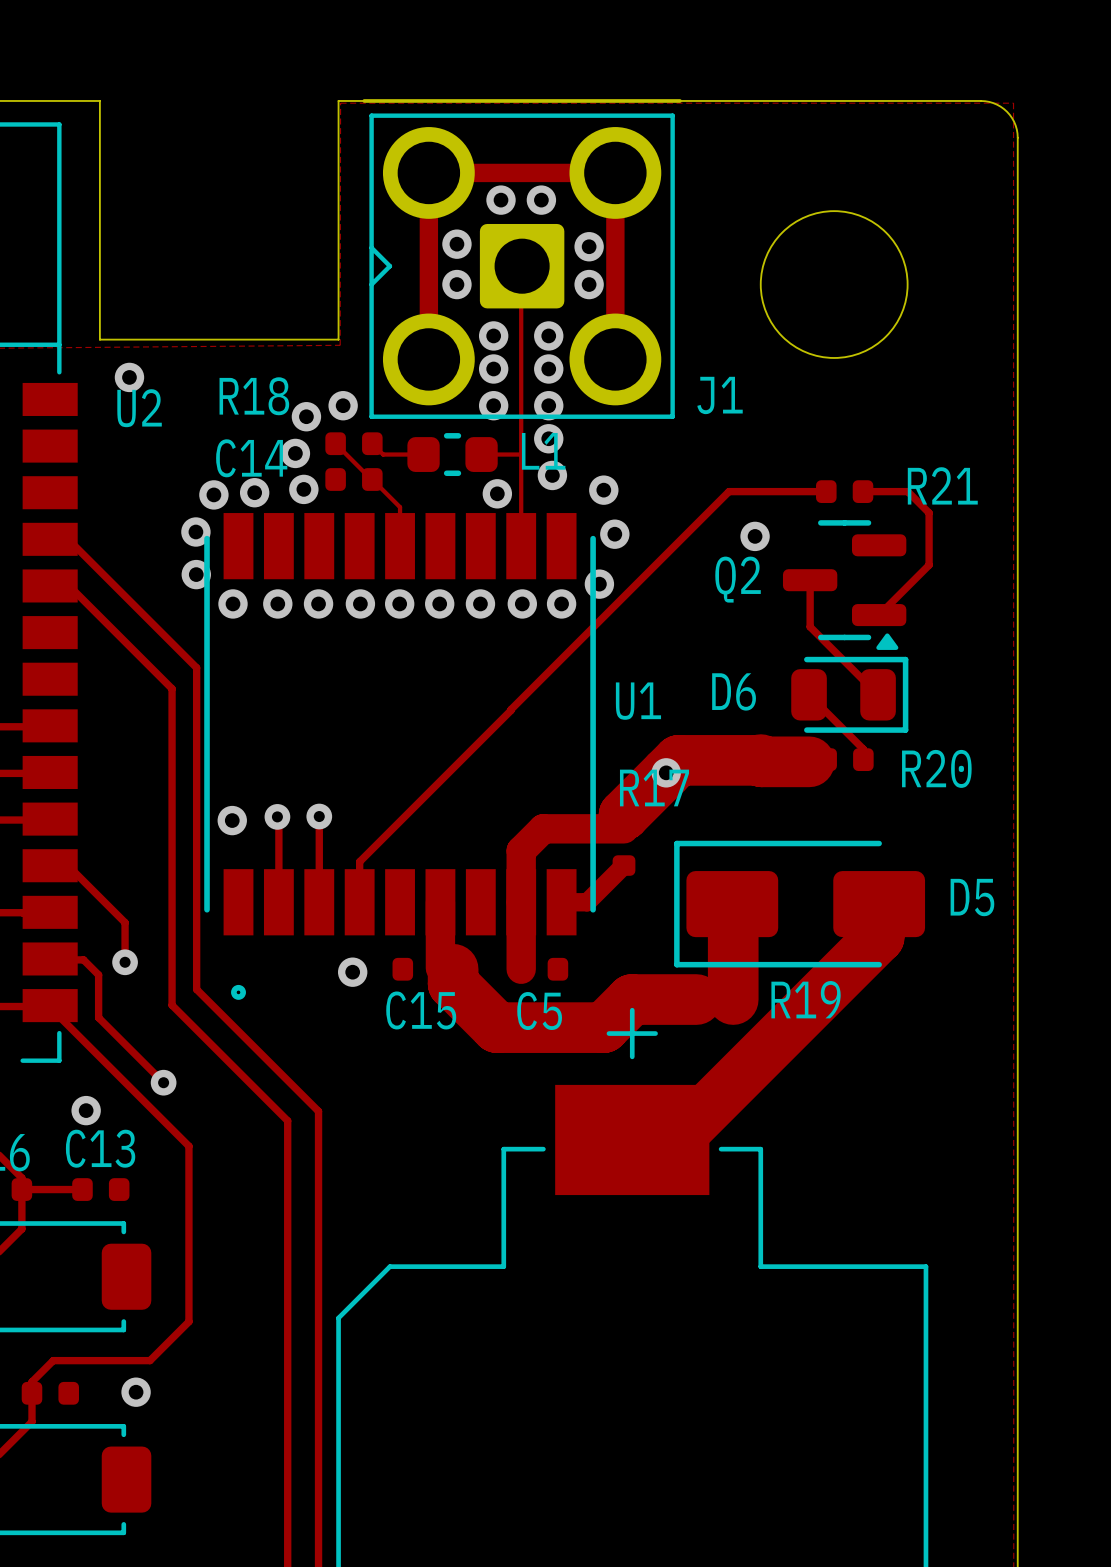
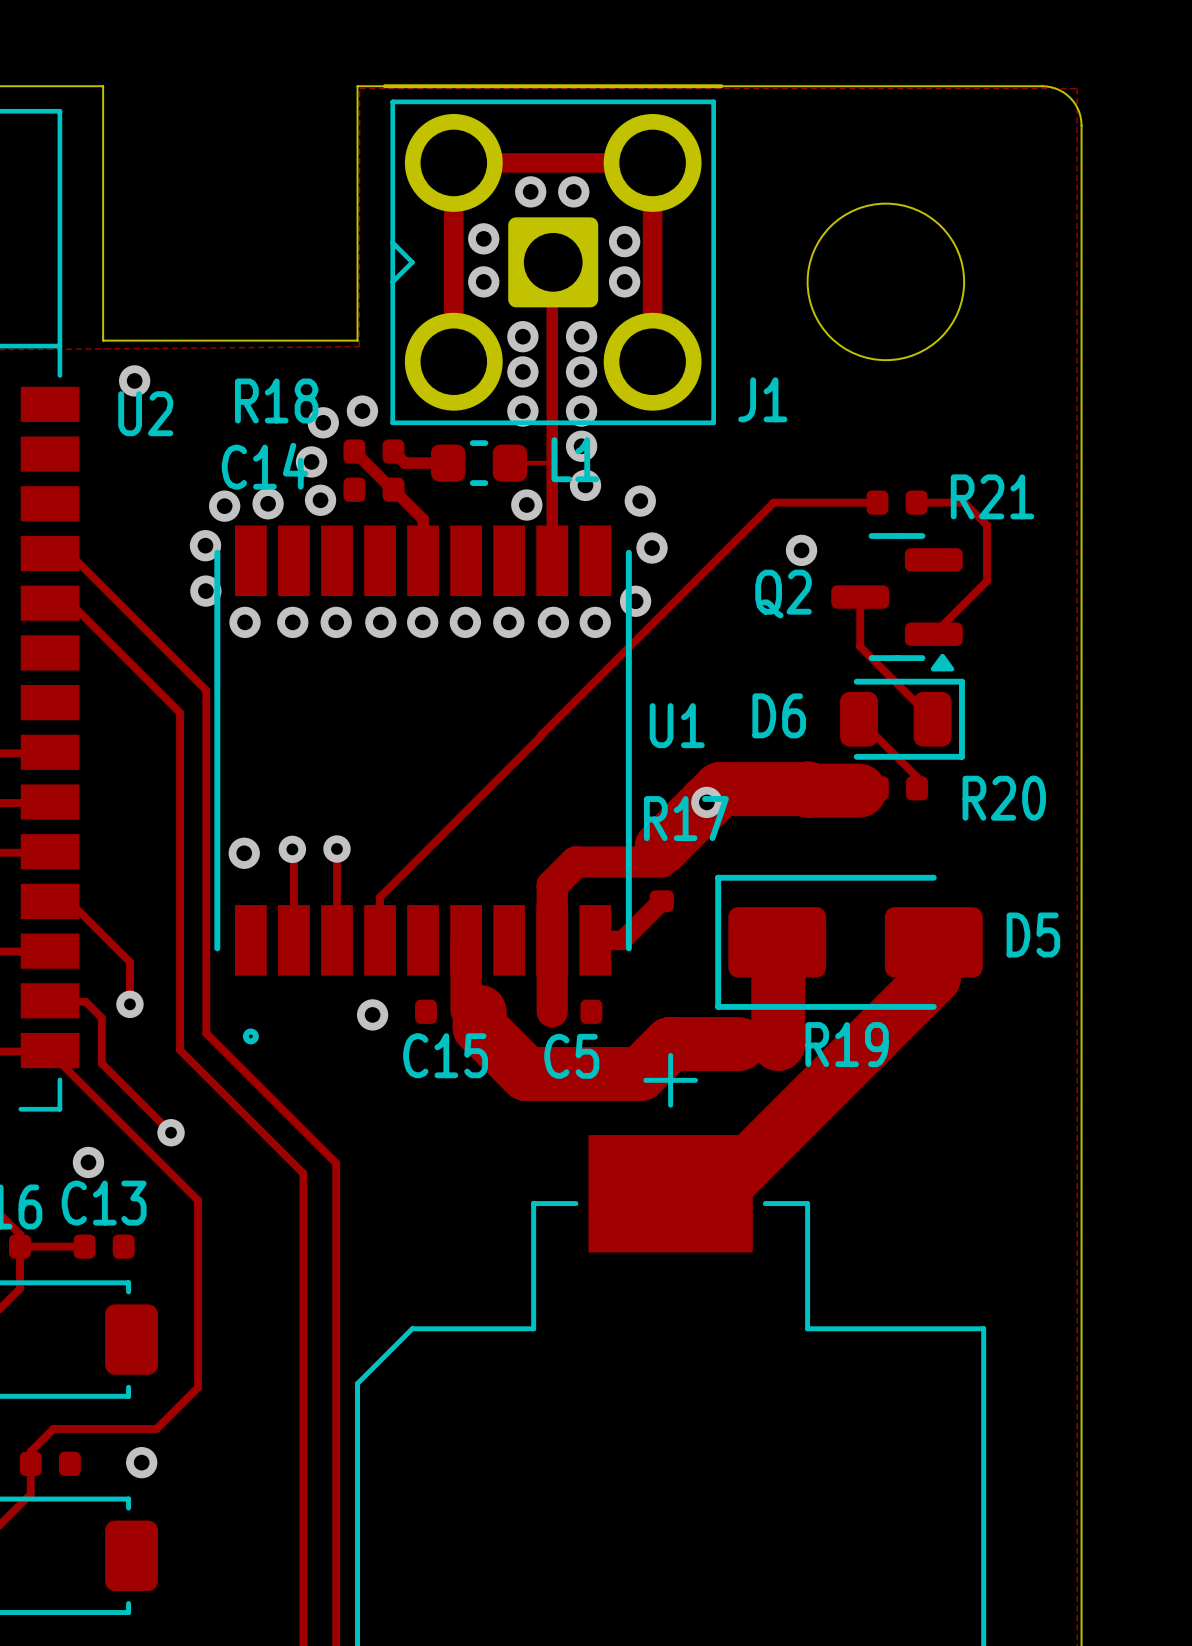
track width: thin (522, 266) (521, 546) -> thick (553, 262) (552, 560)
track width: thin (335, 443) (400, 507) (400, 546) -> thick (354, 451) (423, 519) (423, 560)
track width: thin (372, 443) (383, 454) (423, 454) -> thick (393, 451) (405, 463) (448, 463)

